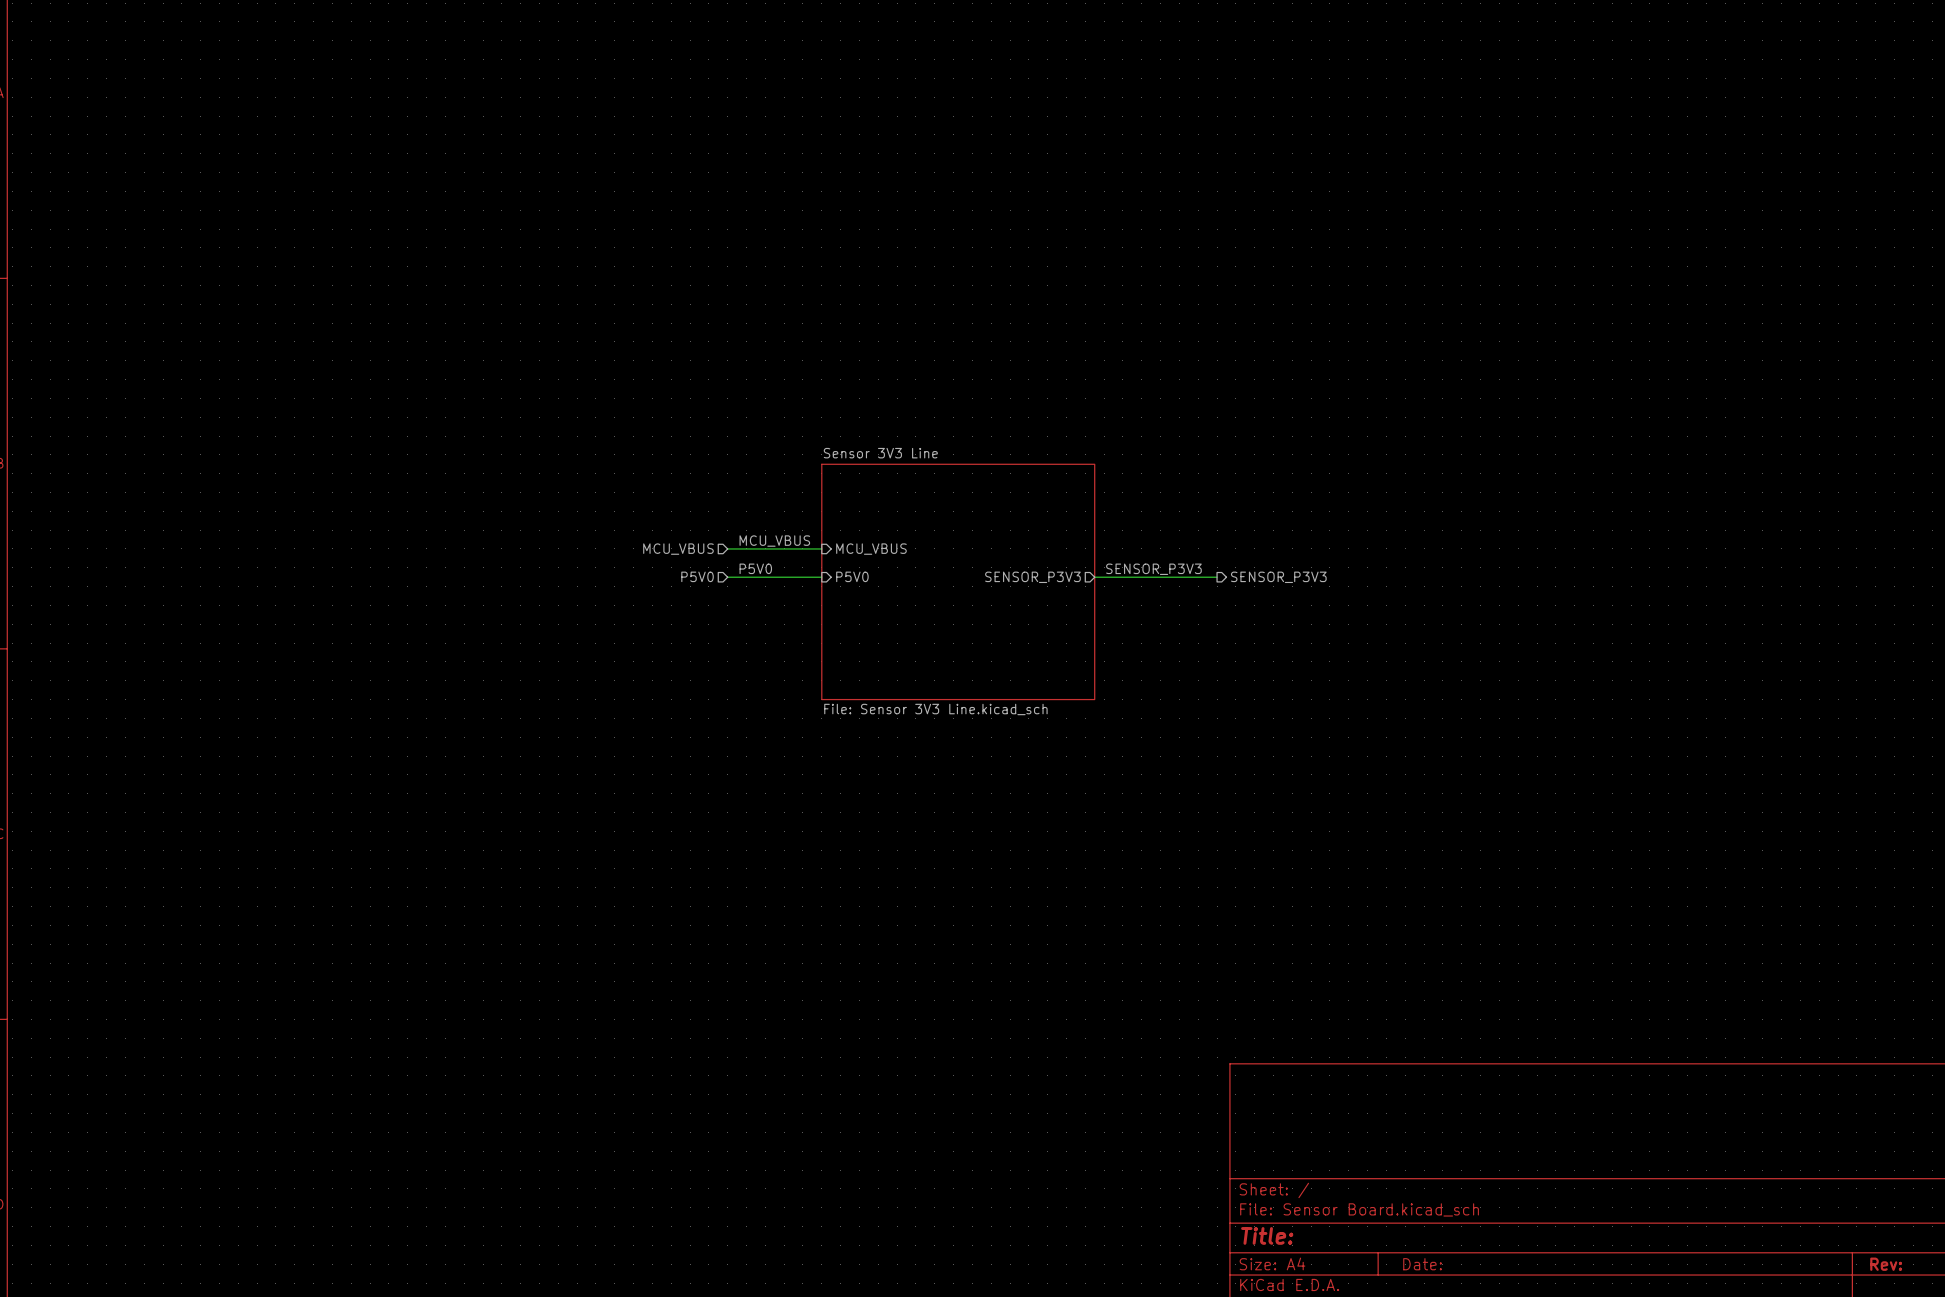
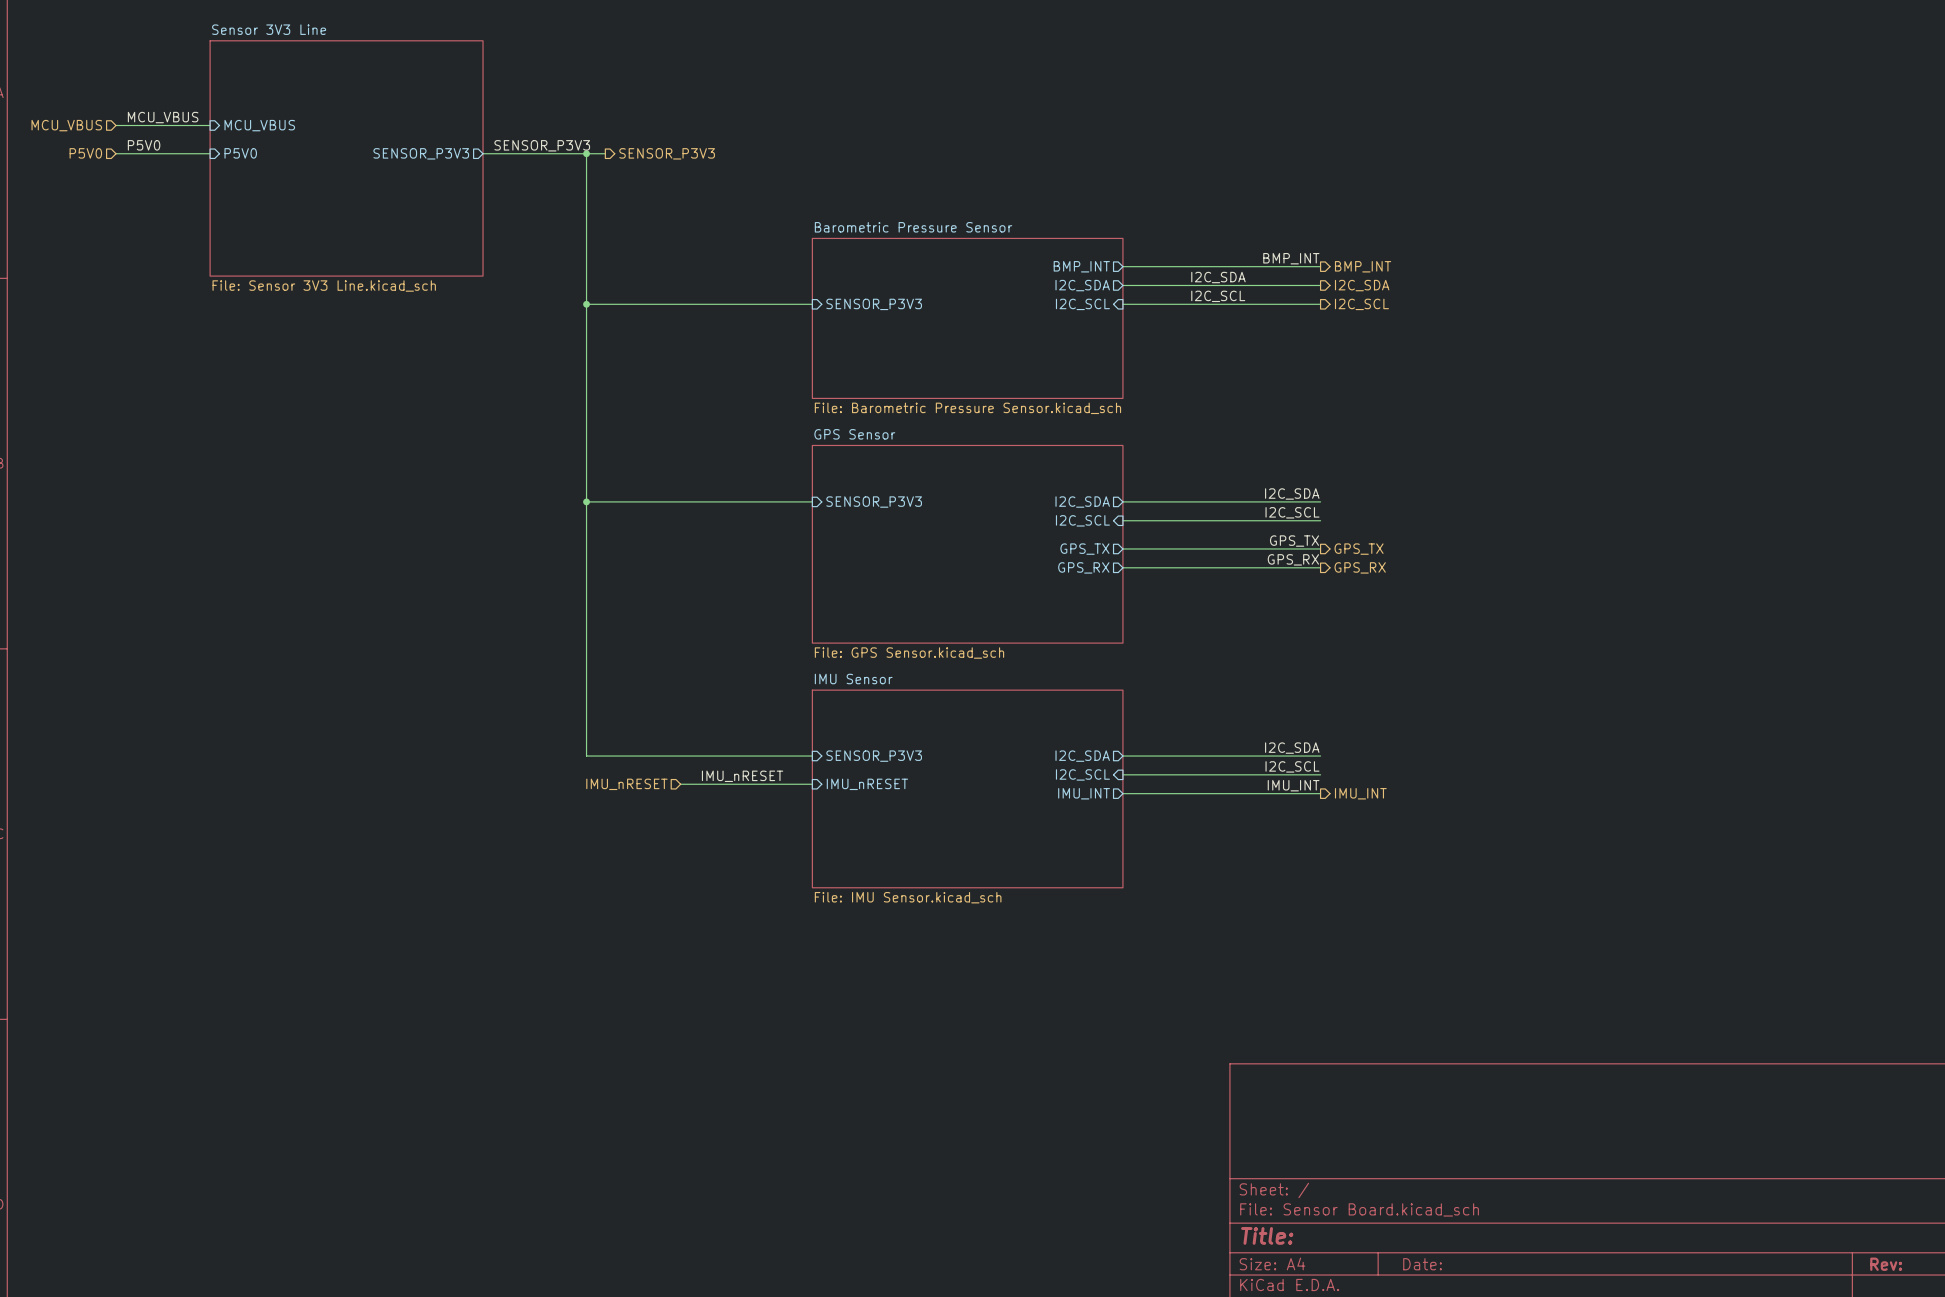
label: none -> MCU_VBUS (163, 117)
hierarchical label: none -> MCU_VBUS (66, 125)
wire: none -> (115, 125) (210, 125)
sheet pin: none -> MCU_VBUS (259, 125)
label: none -> P5V0 (144, 145)
label: none -> SENSOR_P3V3 (542, 145)
hierarchical label: none -> P5V0 (85, 153)
wire: none -> (115, 153) (210, 153)
sheet pin: none -> P5V0 (240, 153)
sheet pin: none -> SENSOR_P3V3 (421, 153)
wire: none -> (483, 153) (605, 153)
wire: none -> (586, 153) (586, 756) (812, 756)
junction: none -> (586, 153)
hierarchical label: none -> SENSOR_P3V3 (667, 153)
label: none -> BMP_INT (1291, 258)
sheet pin: none -> BMP_INT (1081, 266)
wire: none -> (1122, 266) (1320, 266)
hierarchical label: none -> BMP_INT (1363, 266)
label: none -> I2C_SDA (1218, 277)
sheet pin: none -> I2C_SDA (1082, 285)
wire: none -> (1122, 285) (1320, 285)
hierarchical label: none -> I2C_SDA (1362, 285)
label: none -> I2C_SCL (1218, 296)
wire: none -> (586, 304) (812, 304)
junction: none -> (586, 304)
sheet pin: none -> SENSOR_P3V3 (874, 304)
sheet pin: none -> I2C_SCL (1082, 304)
wire: none -> (1122, 304) (1320, 304)
hierarchical label: none -> I2C_SCL (1361, 304)
sheet Barometric Pressure Sensor: none -> File: Barometric Pressure Sensor.kicad_sch (967, 318)
label: none -> I2C_SDA (1292, 493)
wire: none -> (586, 501) (812, 501)
junction: none -> (586, 501)
wire: none -> (1122, 501) (1320, 501)
sheet pin: none -> SENSOR_P3V3 (874, 502)
sheet pin: none -> I2C_SDA (1082, 502)
label: none -> I2C_SCL (1292, 512)
sheet pin: none -> I2C_SCL (1082, 520)
wire: none -> (1122, 520) (1320, 520)
label: MCU_VBUS (774, 541) -> none
label: none -> GPS_TX (1294, 541)
sheet GPS Sensor: none -> File: GPS Sensor.kicad_sch (967, 544)
wire: (727, 548) (821, 548) -> none
wire: none -> (1122, 548) (1320, 548)
hierarchical label: MCU_VBUS (678, 549) -> none
sheet pin: MCU_VBUS (871, 549) -> none
sheet pin: none -> GPS_TX (1084, 549)
hierarchical label: none -> GPS_TX (1359, 549)
label: none -> GPS_RX (1293, 559)
sheet pin: none -> GPS_RX (1083, 567)
wire: none -> (1122, 567) (1320, 567)
hierarchical label: none -> GPS_RX (1360, 567)
label: P5V0 (755, 568) -> none
label: SENSOR_P3V3 (1153, 569) -> none
hierarchical label: P5V0 (697, 576) -> none
sheet pin: P5V0 (852, 576) -> none
wire: (727, 577) (821, 577) -> none
sheet pin: SENSOR_P3V3 (1032, 577) -> none
wire: (1094, 577) (1217, 577) -> none
hierarchical label: SENSOR_P3V3 (1278, 577) -> none
sheet Sensor 3V3 Line position: (958, 581) -> (346, 158)
label: none -> I2C_SDA (1292, 748)
sheet pin: none -> SENSOR_P3V3 (874, 756)
sheet pin: none -> I2C_SDA (1082, 756)
wire: none -> (1122, 756) (1320, 756)
label: none -> I2C_SCL (1292, 766)
sheet pin: none -> I2C_SCL (1082, 774)
wire: none -> (1122, 774) (1320, 774)
label: none -> IMU_nRESET (742, 776)
hierarchical label: none -> IMU_nRESET (626, 784)
wire: none -> (680, 784) (812, 784)
sheet pin: none -> IMU_nRESET (867, 784)
label: none -> IMU_INT (1293, 785)
sheet IMU Sensor: none -> File: IMU Sensor.kicad_sch (967, 788)
sheet pin: none -> IMU_INT (1084, 793)
wire: none -> (1122, 793) (1320, 793)
hierarchical label: none -> IMU_INT (1360, 793)

